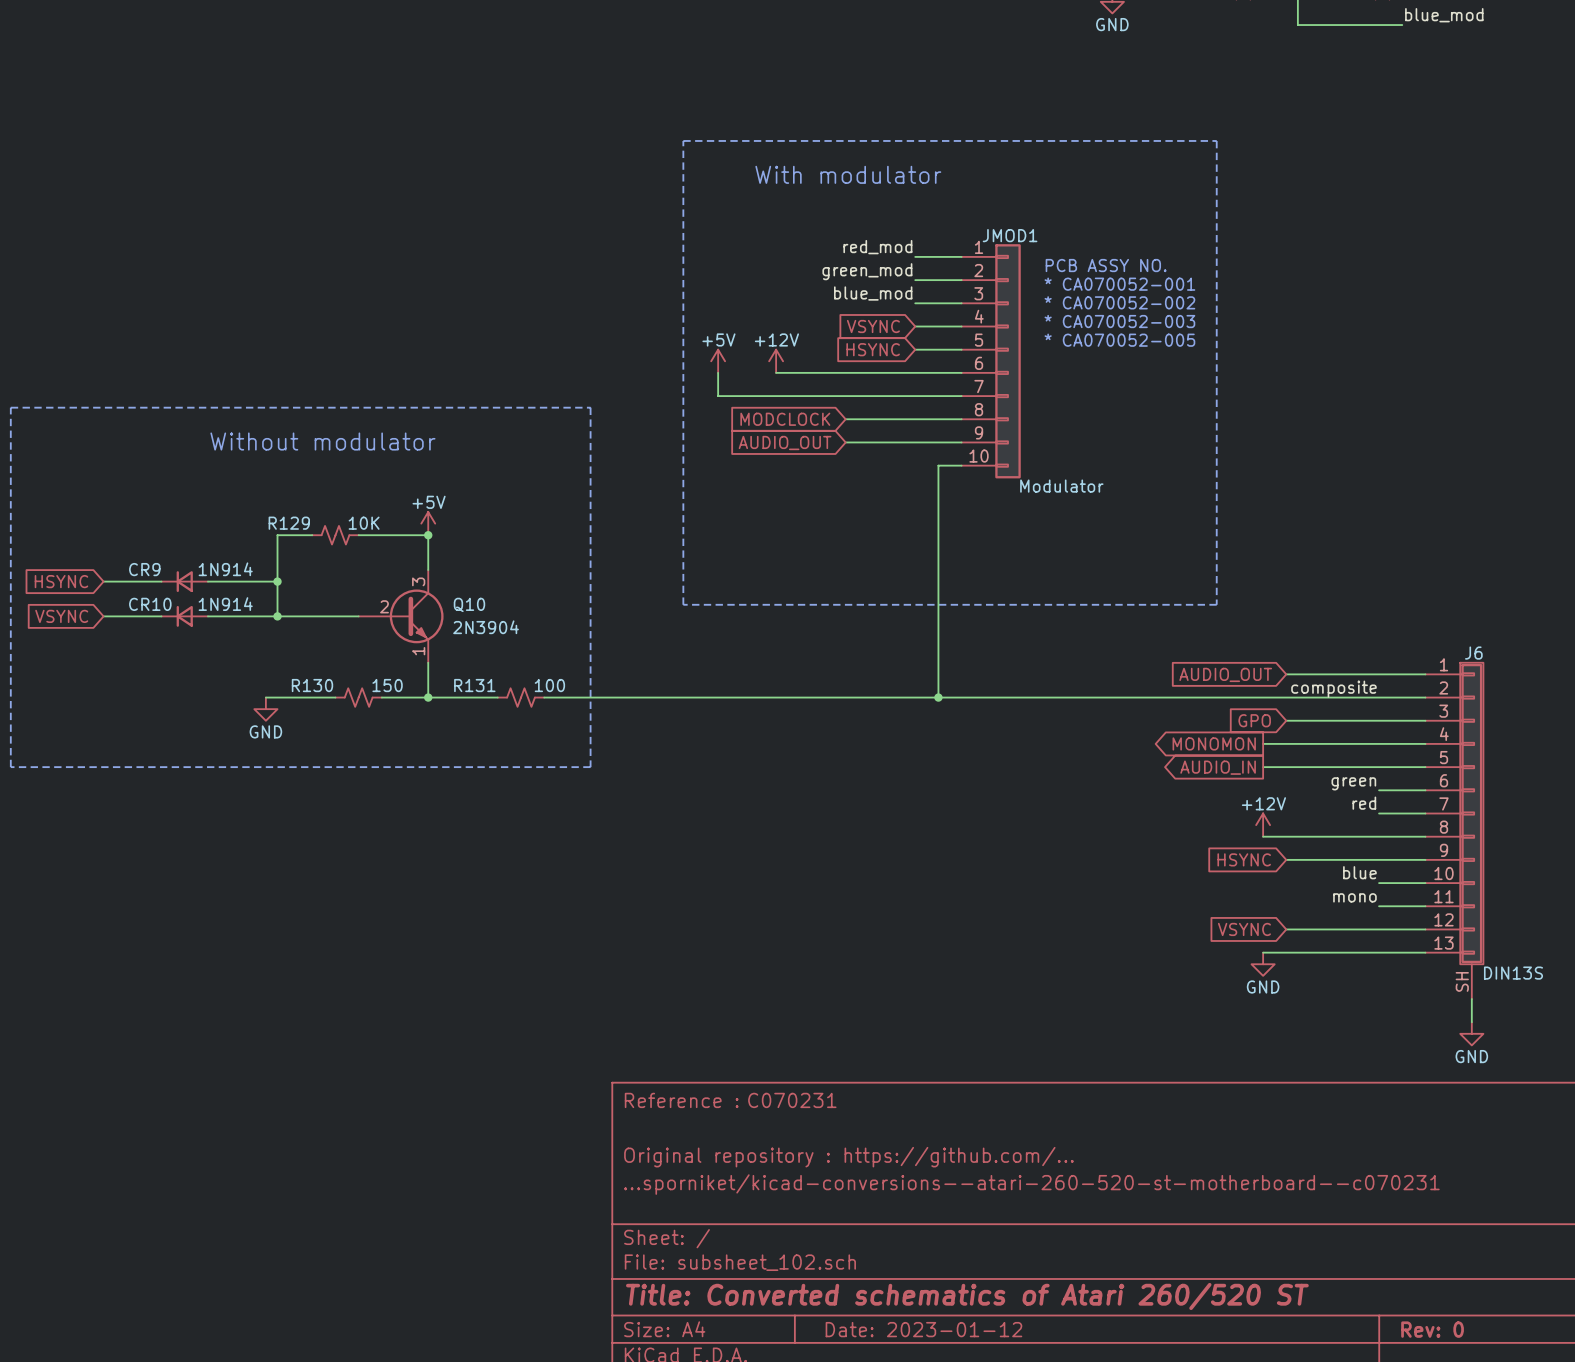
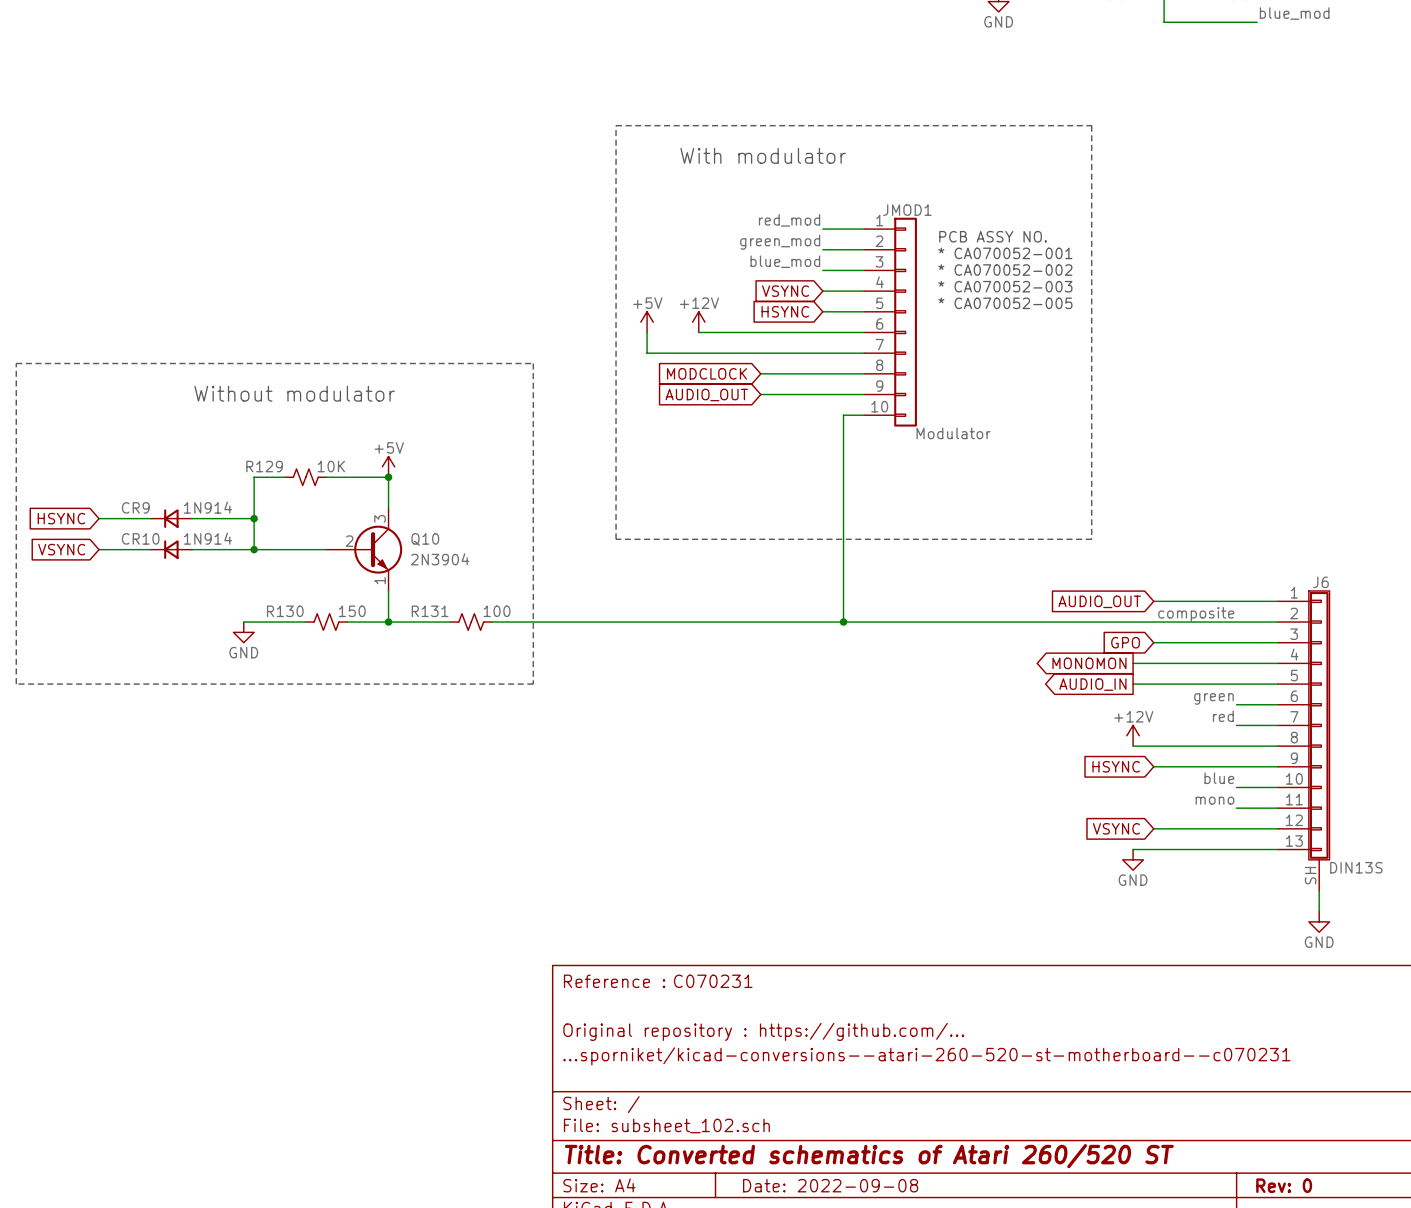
title block: Date: 2023-01-12 (923, 1329) -> Date: 2022-09-08 (830, 1185)

